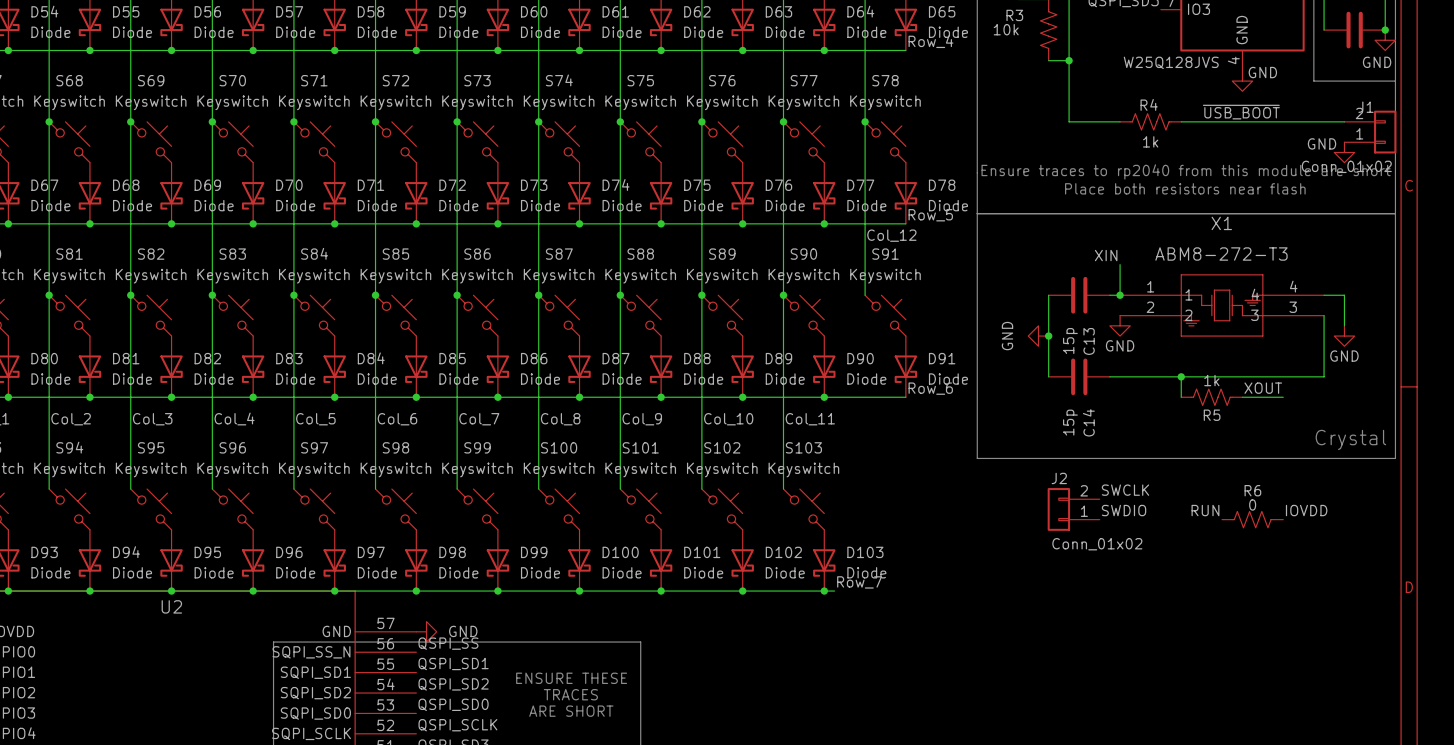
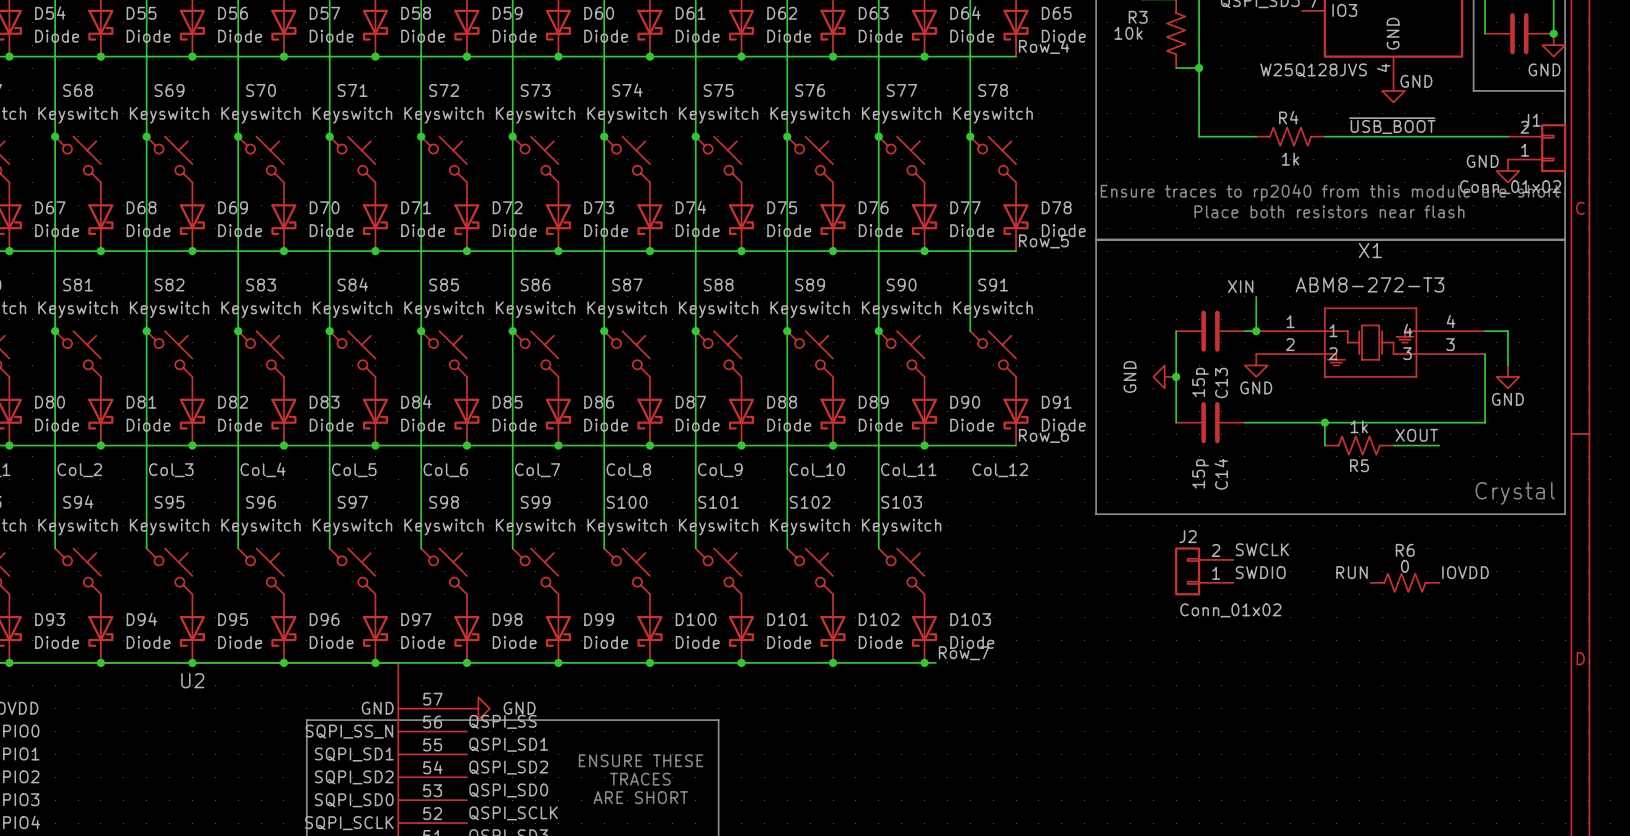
label position: Col_12 (891, 235) -> Col_12 (1000, 470)

